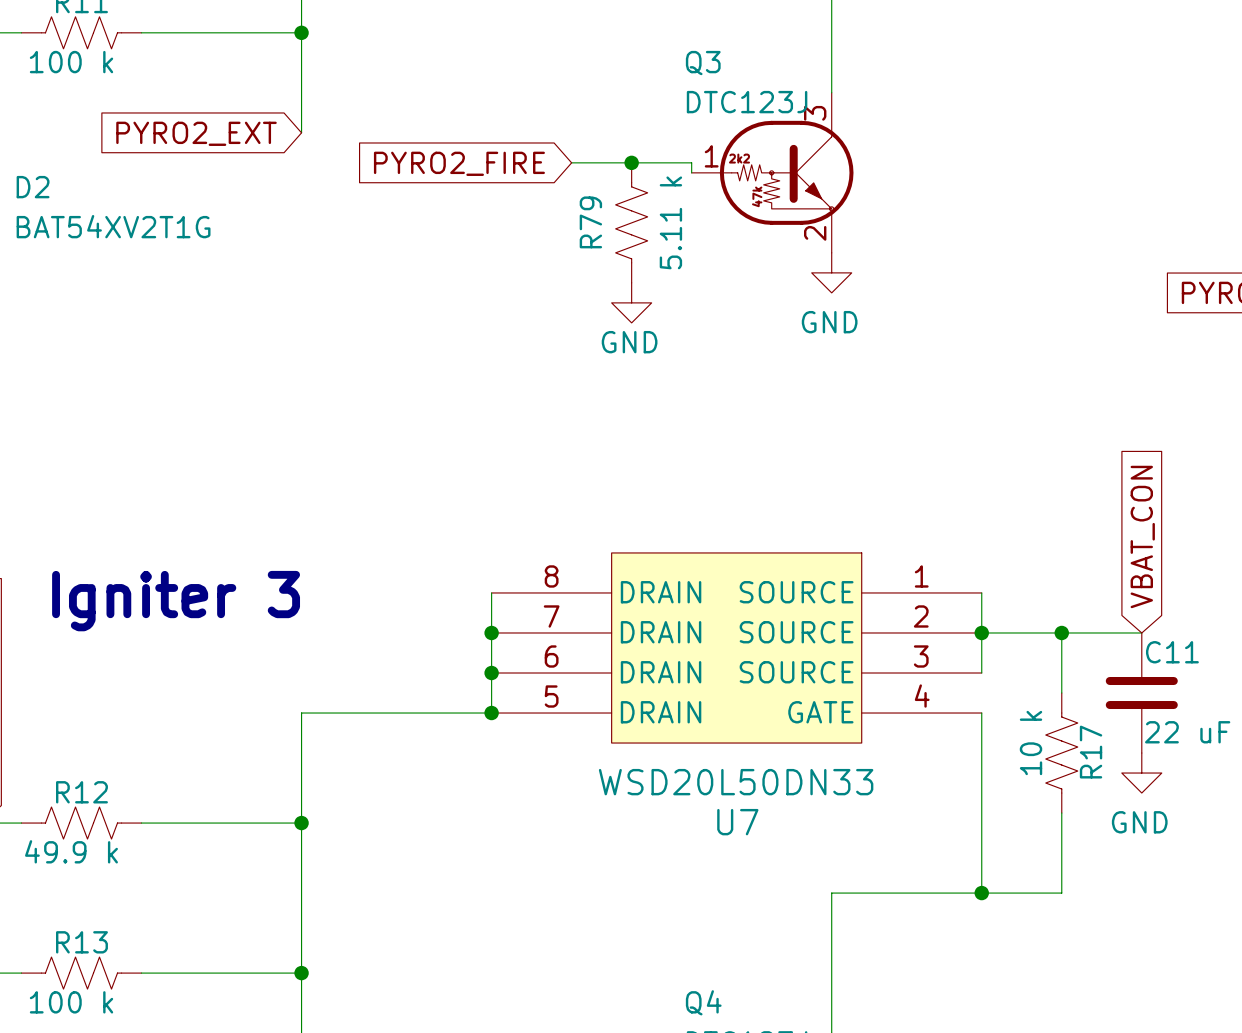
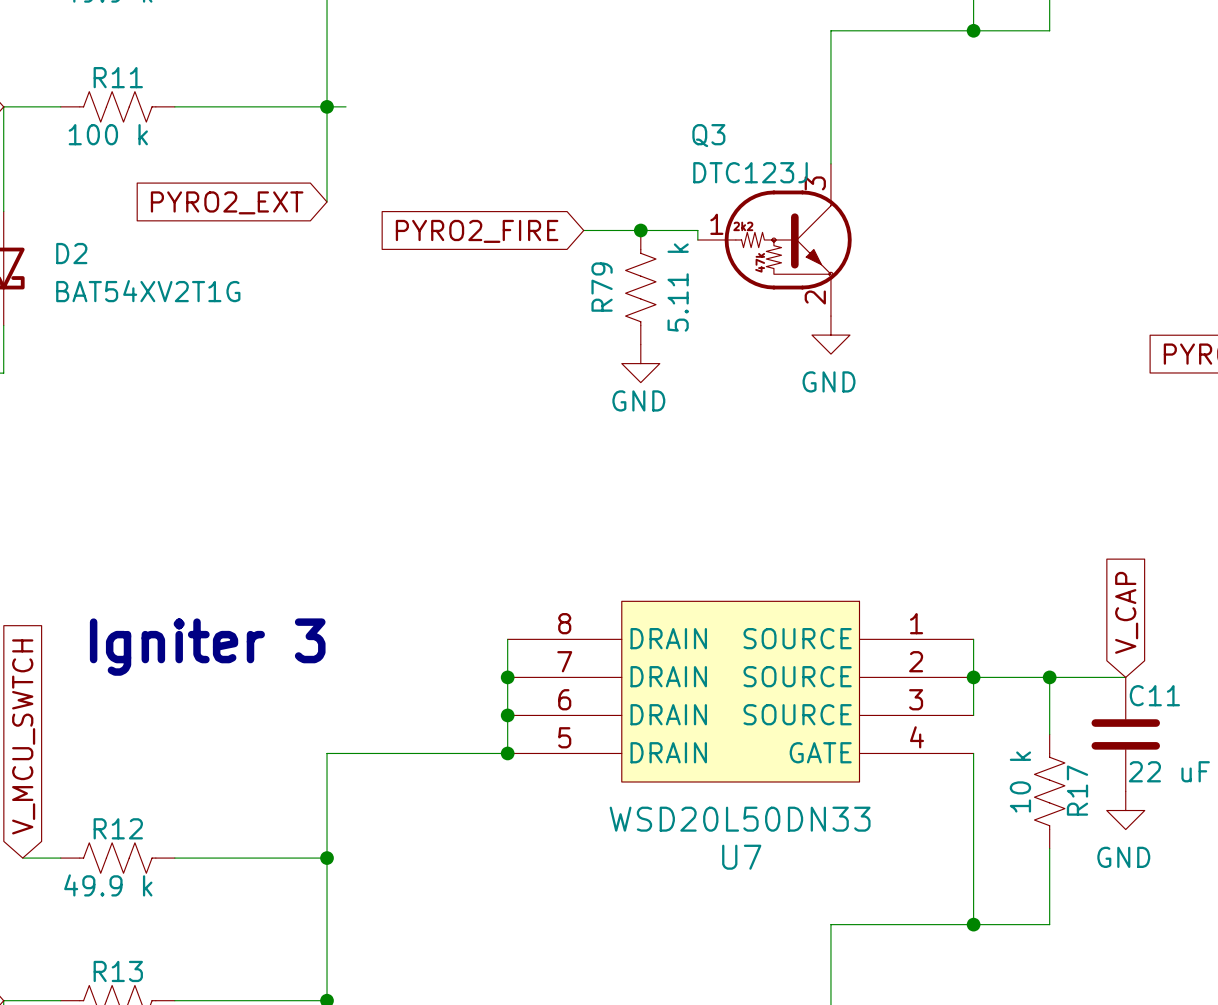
wire: none -> (327, 106) (346, 106)
global label: VBAT_CON (1142, 536) -> V_CAP (1126, 612)

